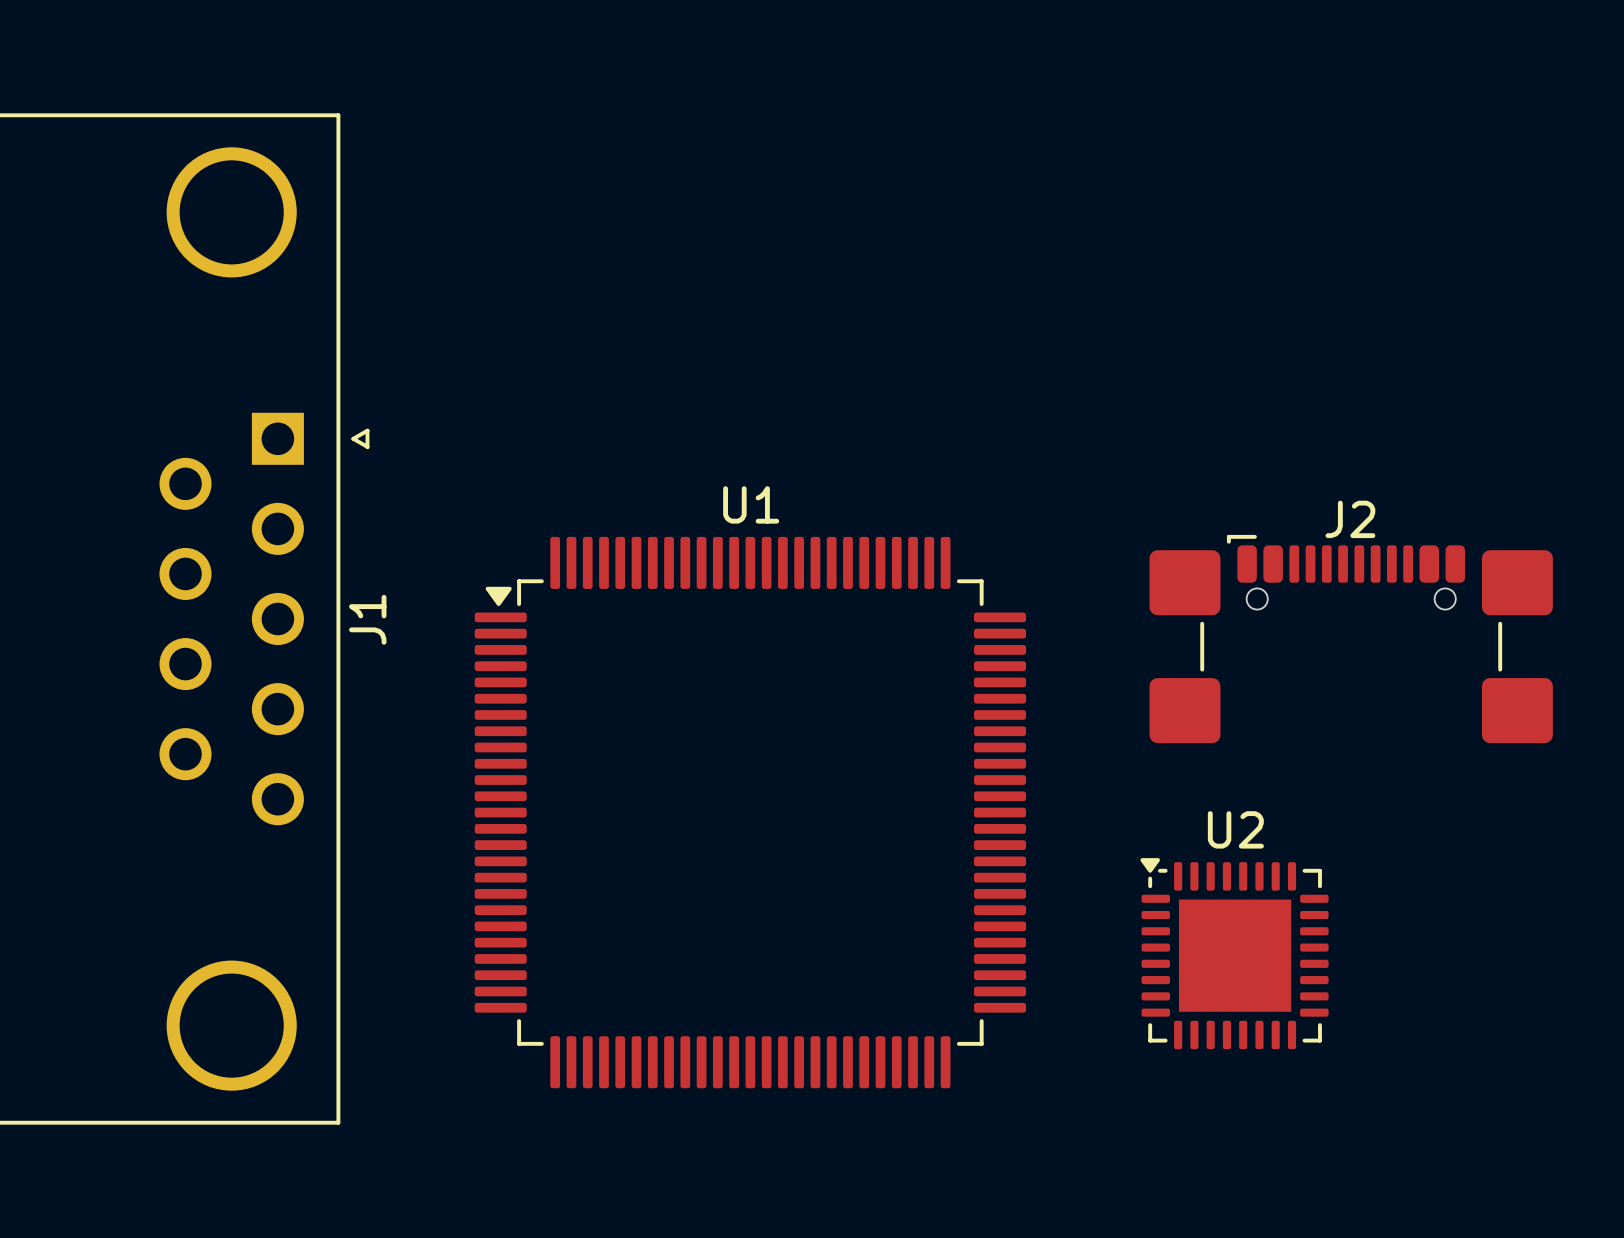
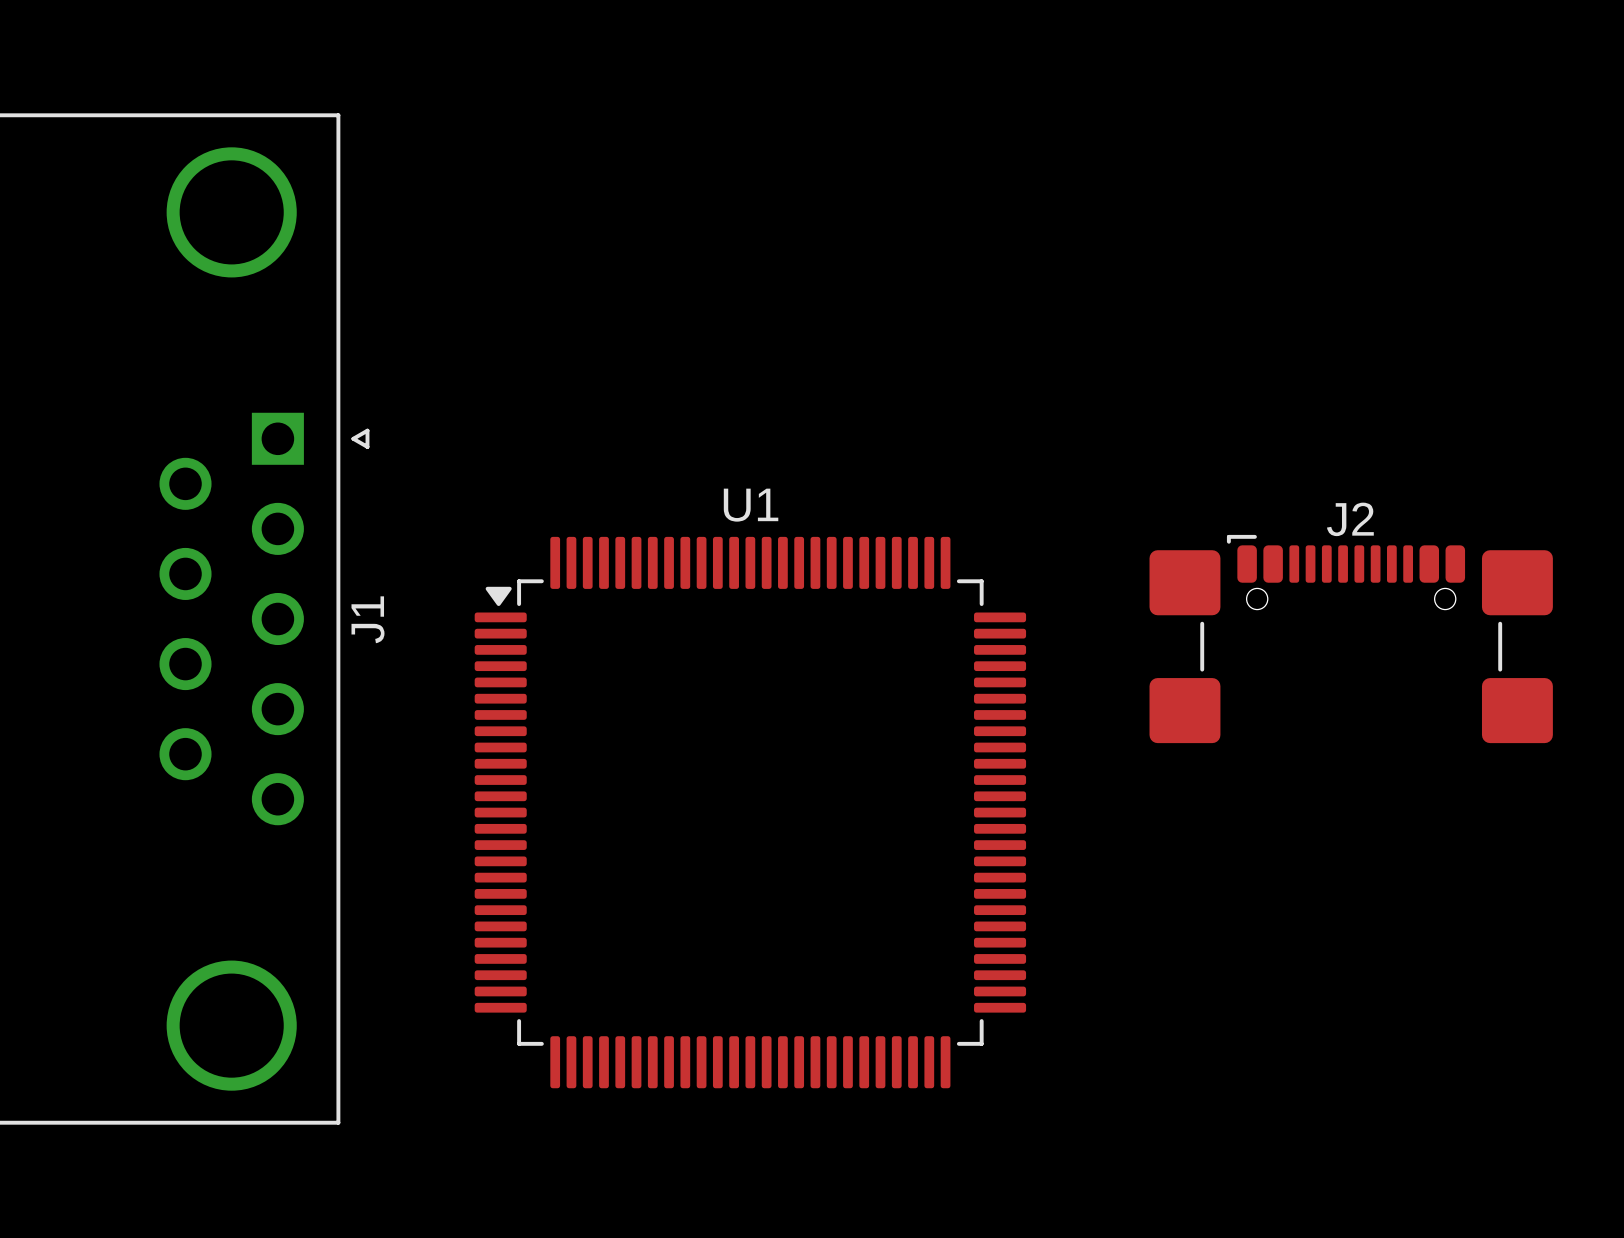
U2: (1234, 953) -> none

